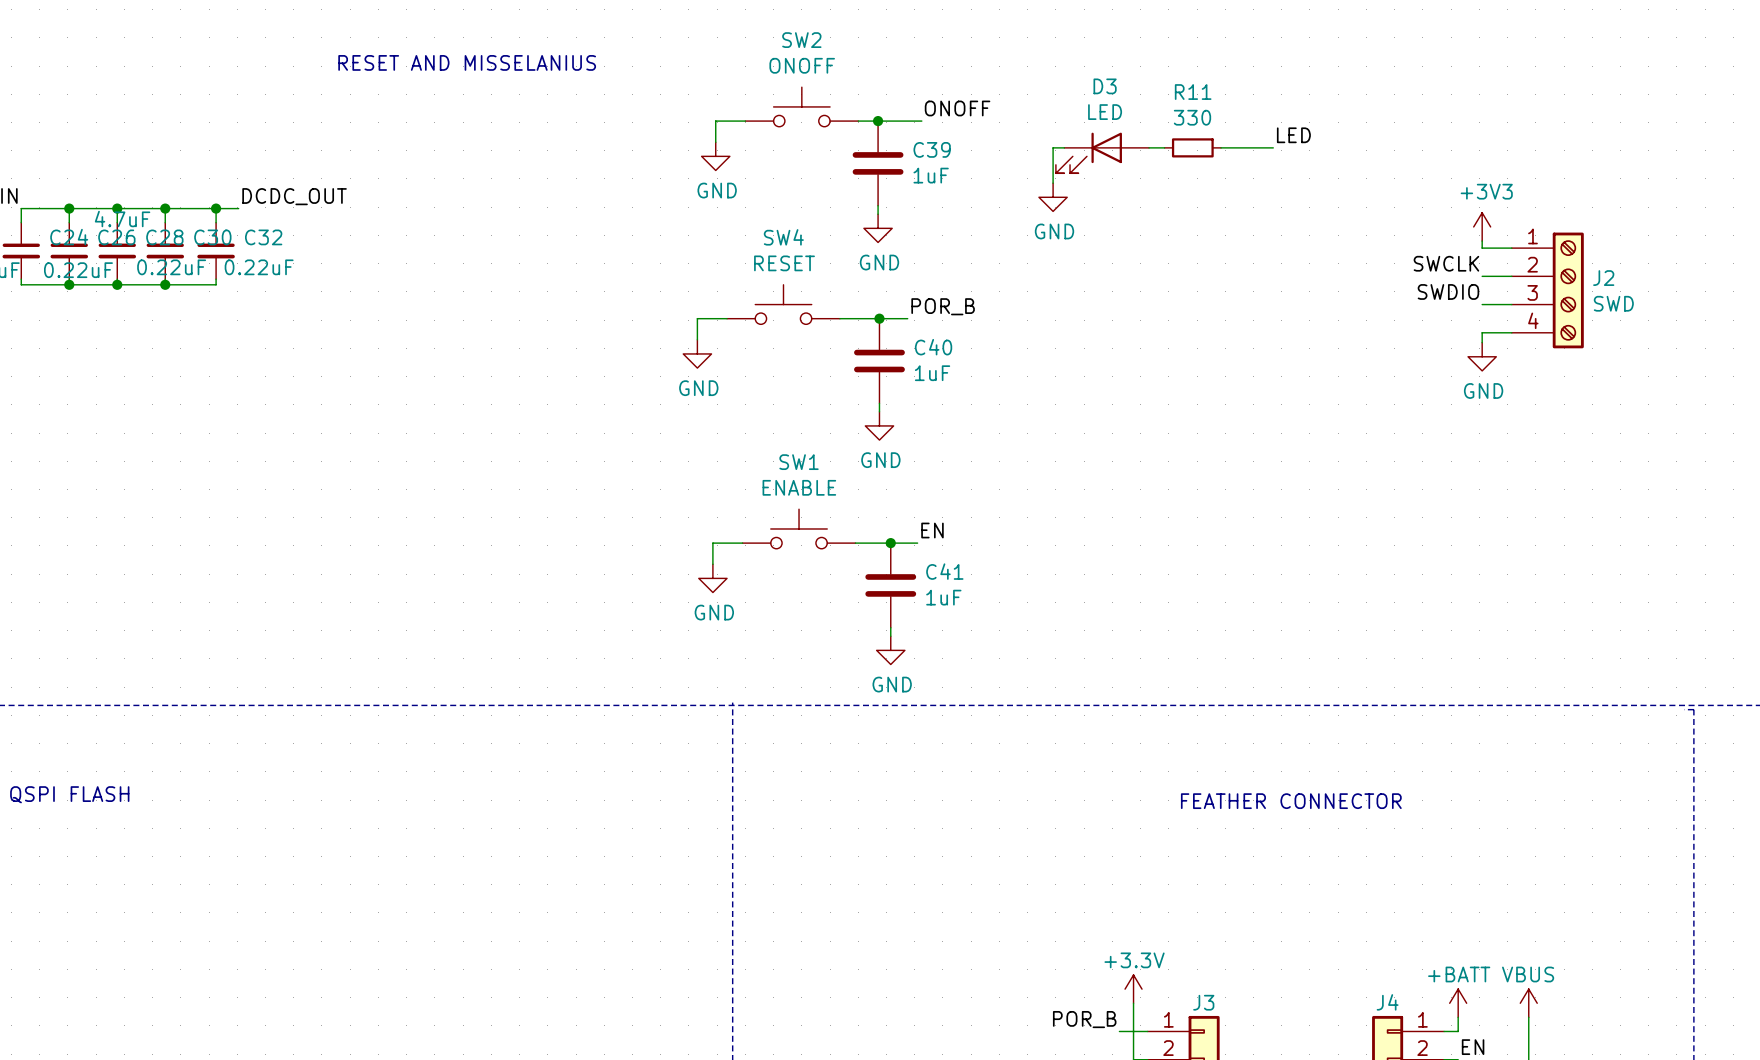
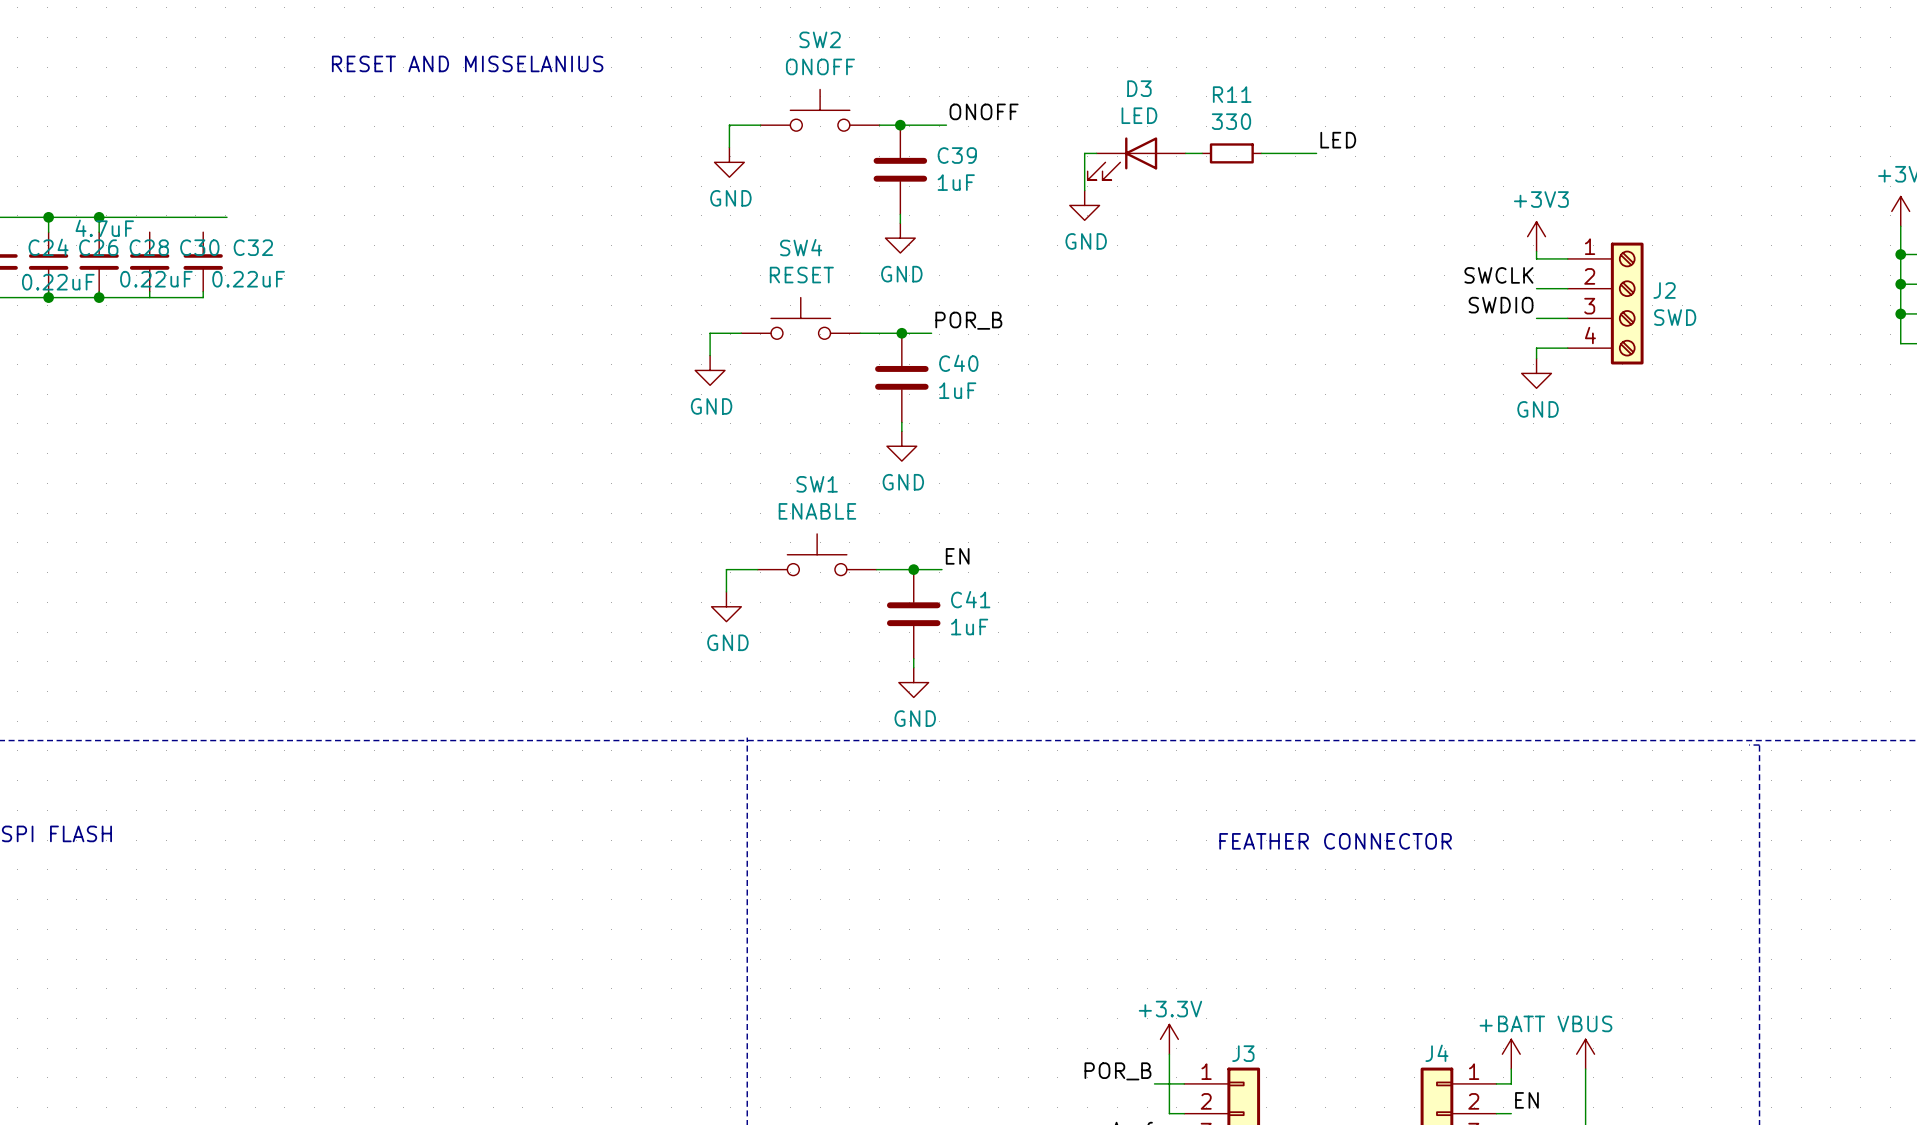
label: DCDC_OUT (294, 196) -> none
wire: (165, 208) (165, 222) -> none
junction: (165, 208) -> none
wire: (216, 208) (216, 222) -> none
junction: (216, 208) -> none
junction: (165, 284) -> none

